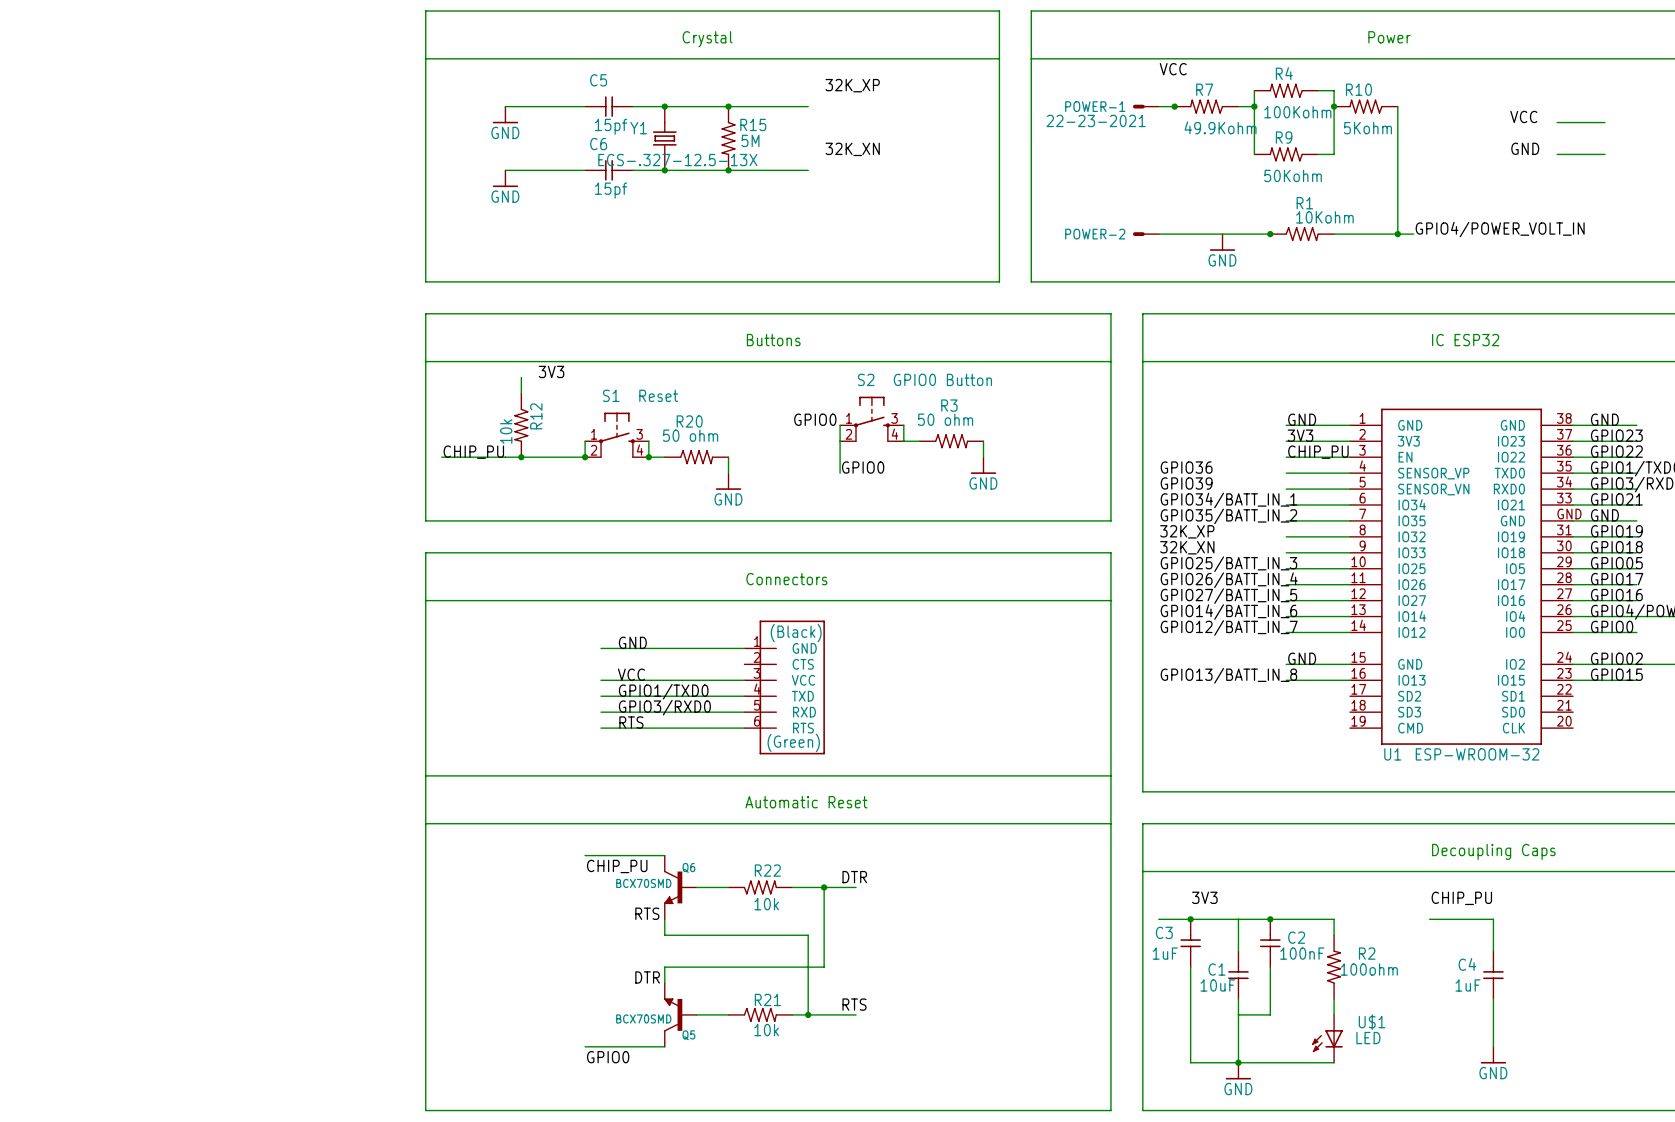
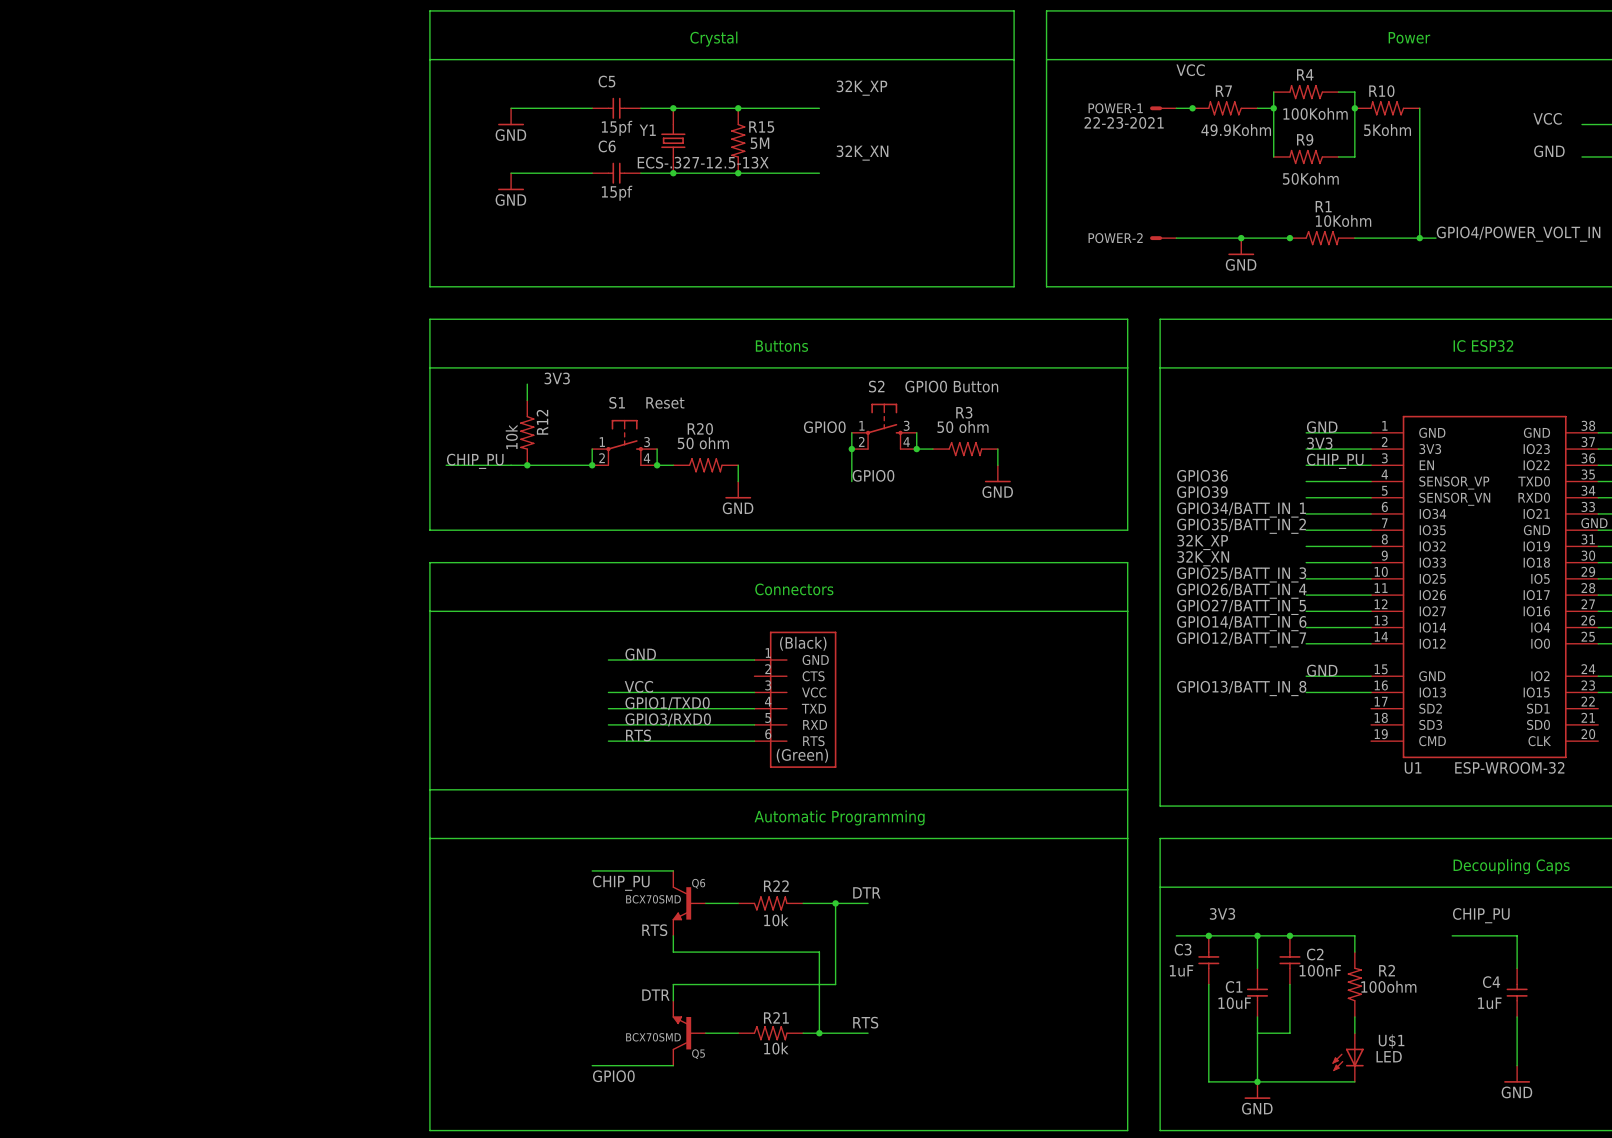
junction: none -> (1241, 238)
junction: none -> (851, 449)
junction: none -> (916, 449)
text: Automatic Reset (806, 802) -> Automatic Programming (839, 817)
junction: none -> (1257, 935)

